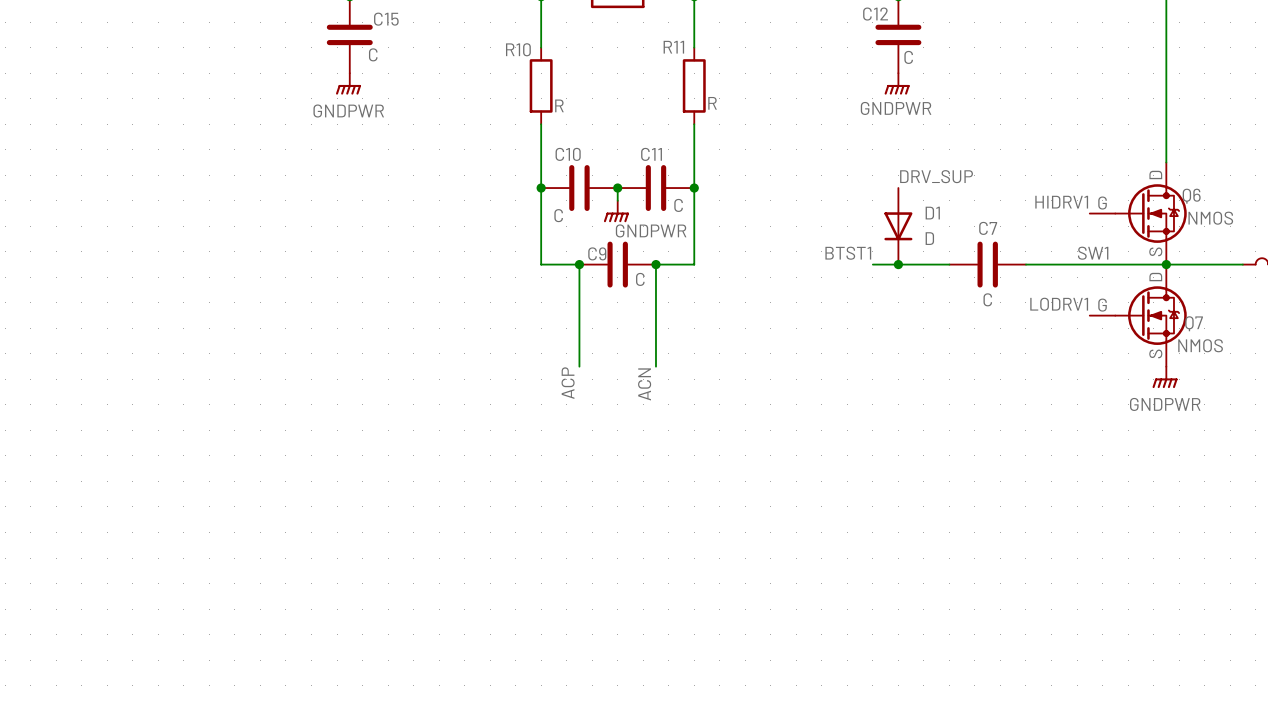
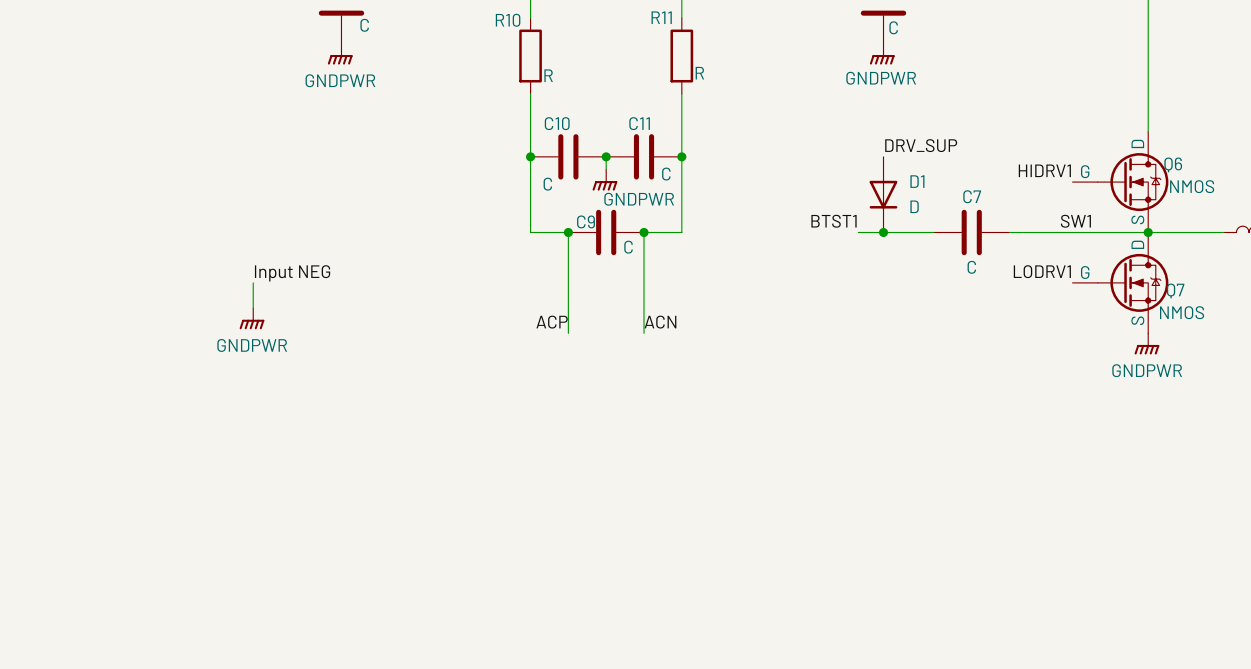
label: none -> Input NEG (292, 273)
wire: none -> (253, 282) (253, 308)
power symbol: none -> GNDPWR (251, 318)
label rotation: 0° (568, 383) -> 90° clockwise (552, 322)
label rotation: 0° (644, 384) -> 90° clockwise (660, 322)
label position: ACN (644, 384) -> ACN (660, 322)

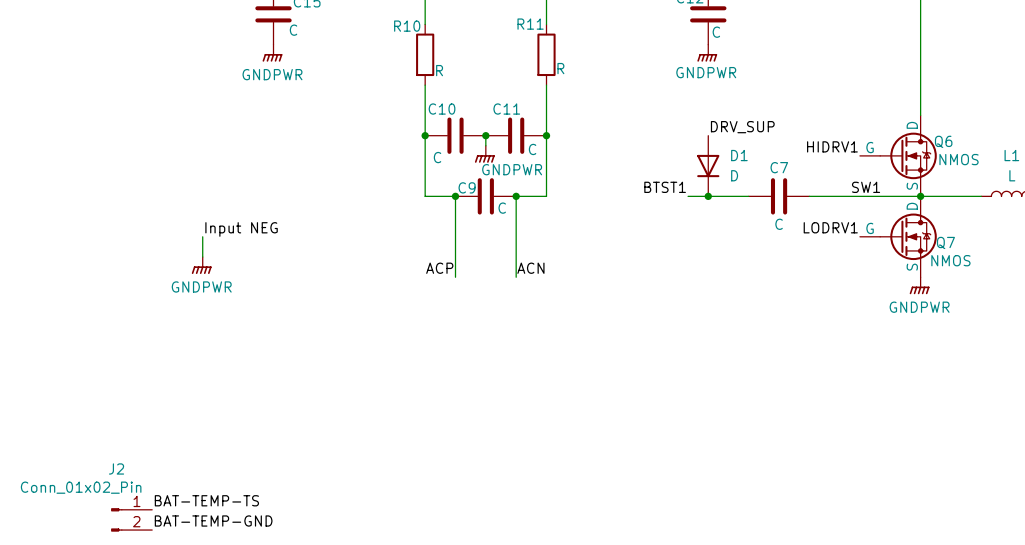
label: none -> BAT-TEMP-TS (206, 500)
J2: none -> Conn_01x02_Pin (131, 519)
label: none -> BAT-TEMP-GND (213, 521)

